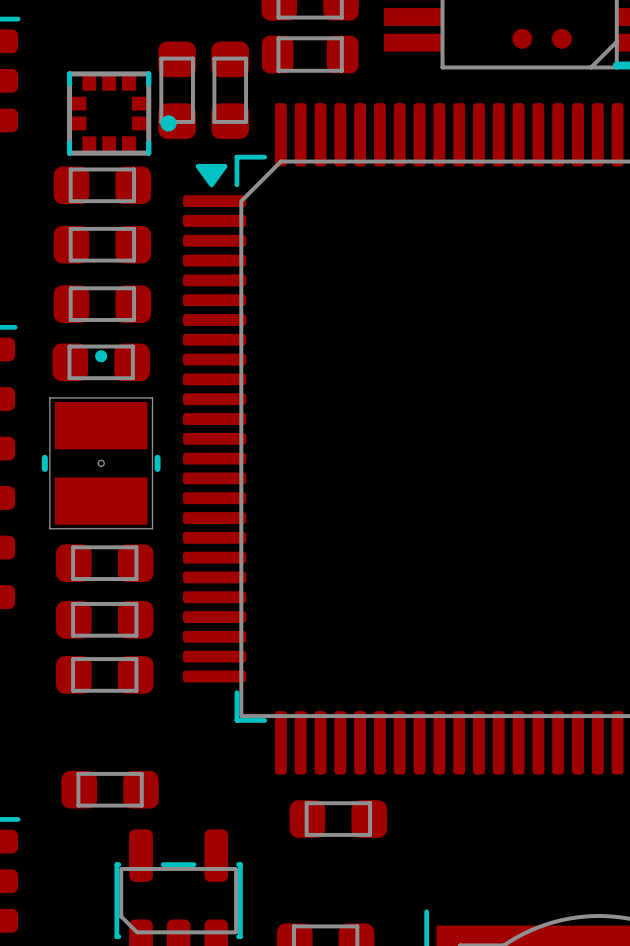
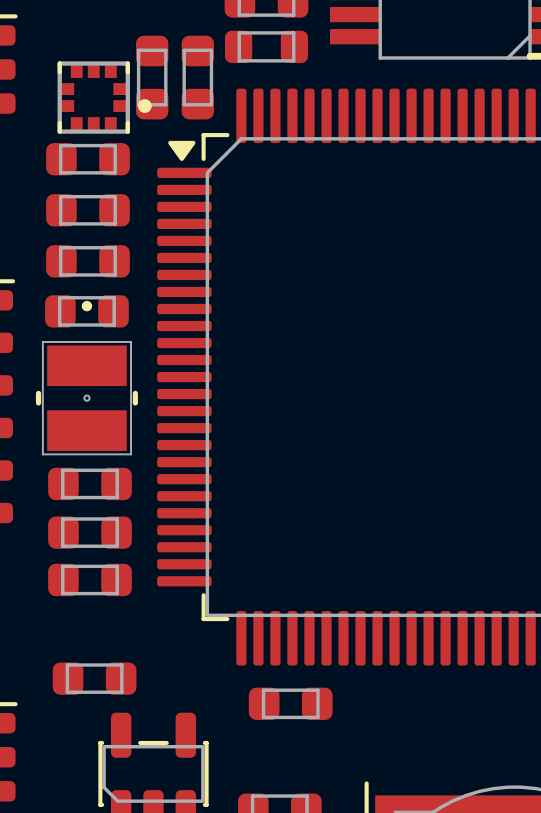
part: (542, 38) -> none

